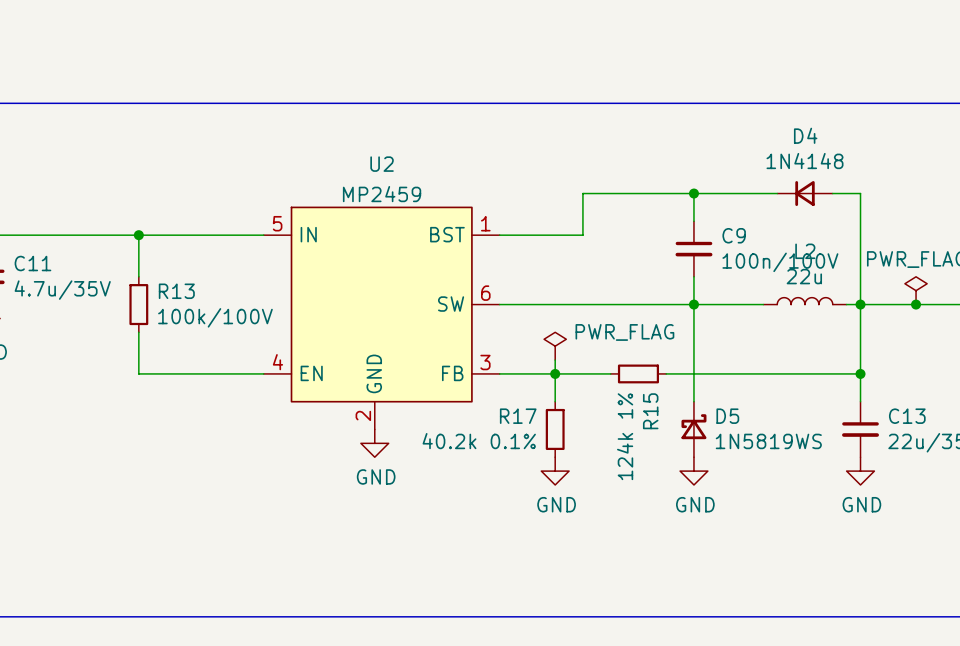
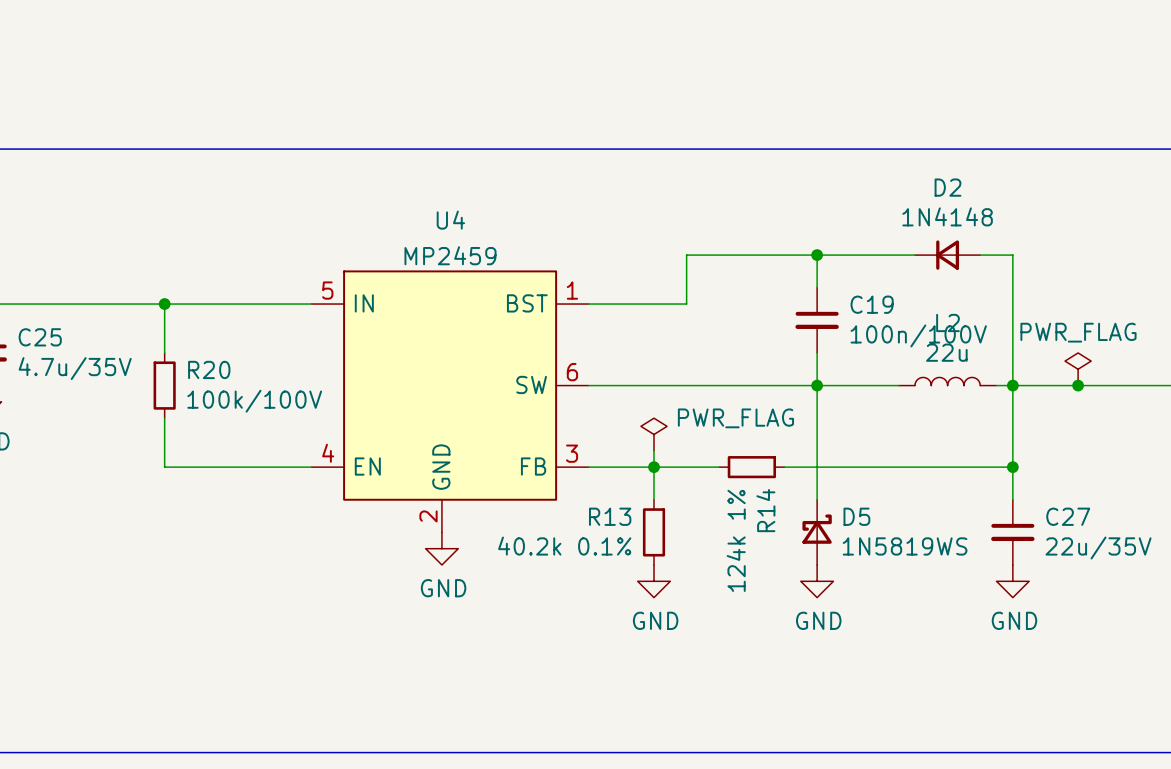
D4 name: D4 (805, 135) -> D2 (947, 187)
U2 name: U2 (382, 164) -> U4 (450, 220)
C9 name: C9 (734, 235) -> C19 (872, 304)
C11 name: C11 (32, 263) -> C25 (40, 337)
R13 name: R13 (176, 291) -> R20 (209, 369)
R15 name: R15 (650, 411) -> R14 (765, 510)
R17 name: R17 (518, 416) -> R13 (610, 516)
C13 name: C13 (907, 416) -> C27 (1068, 516)

